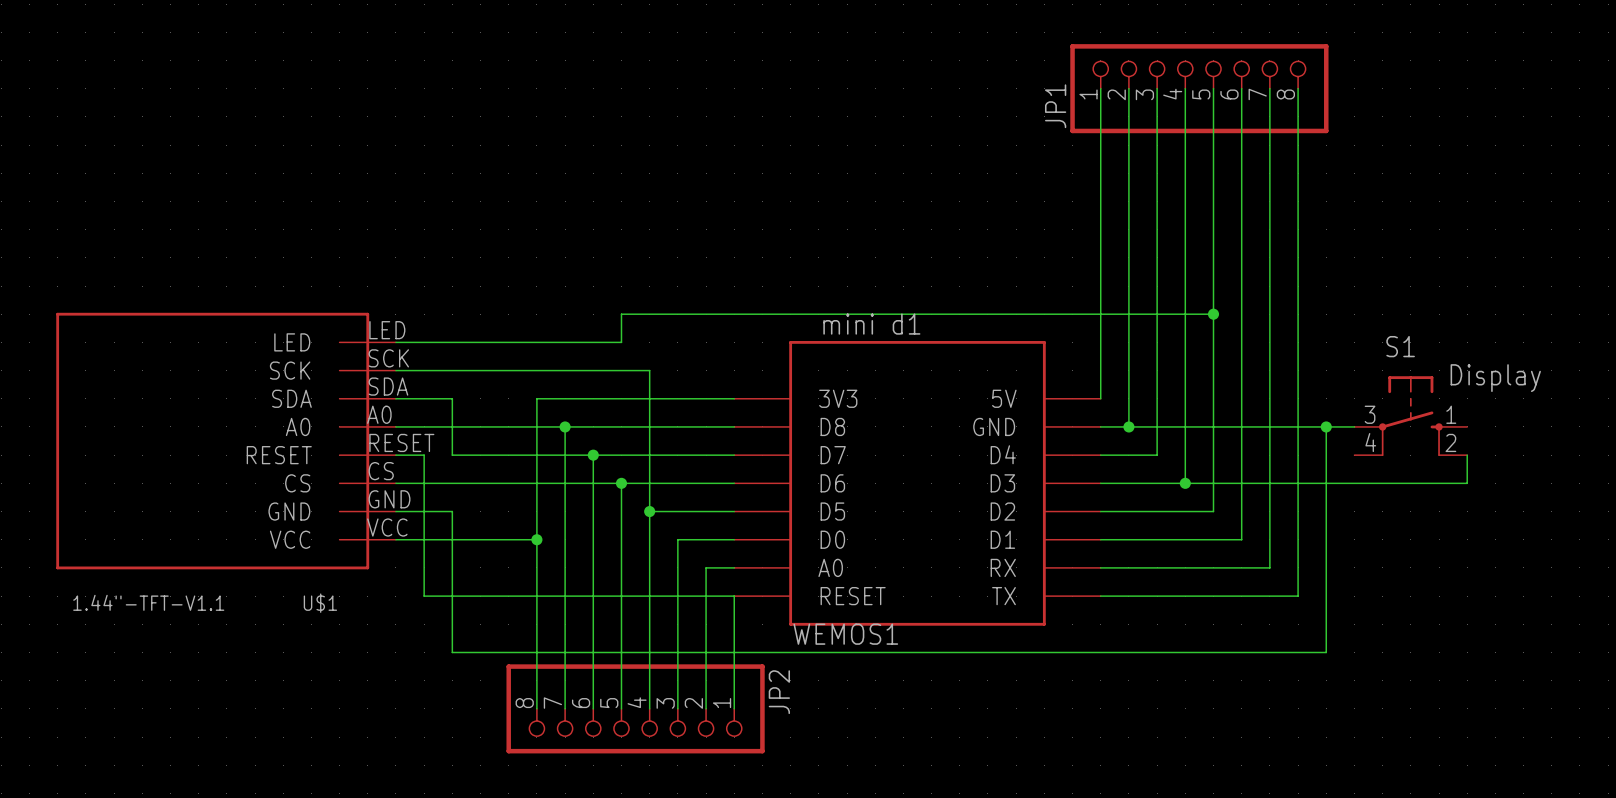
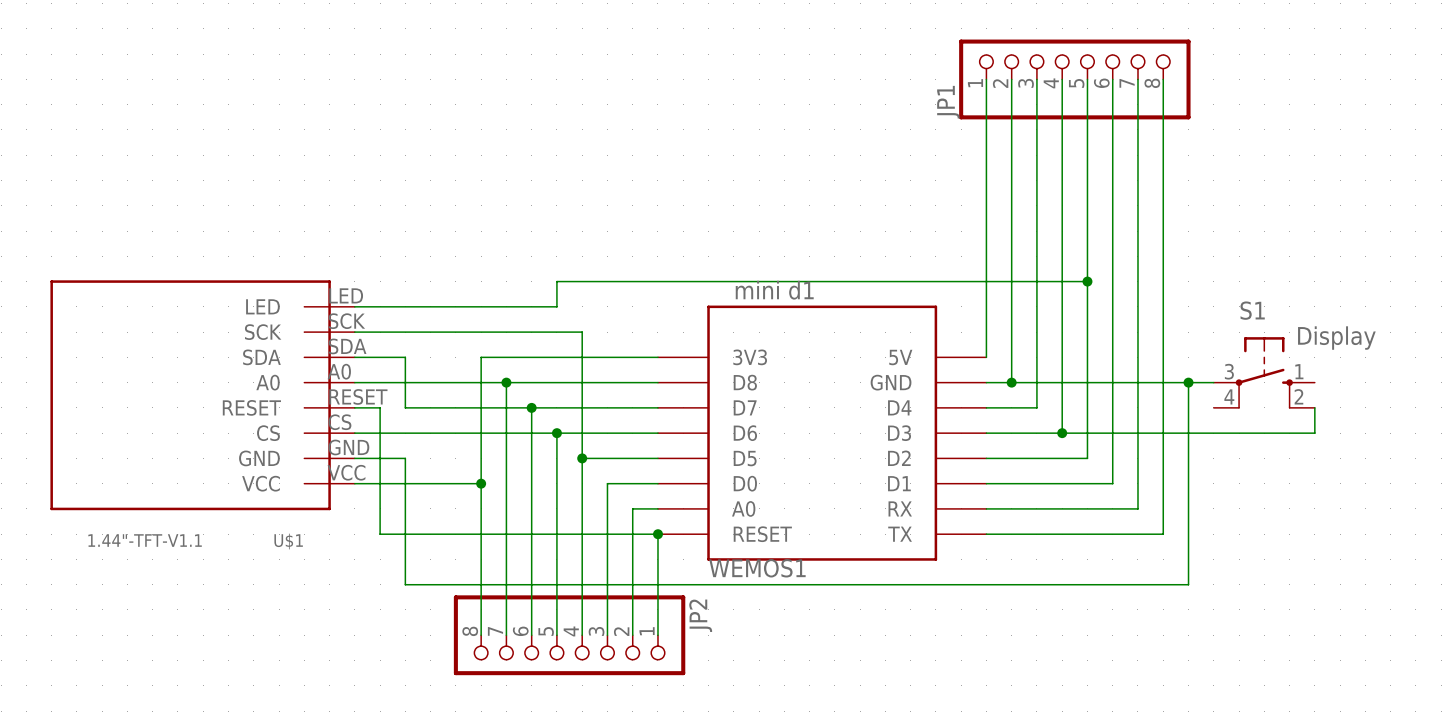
junction: none -> (657, 534)

